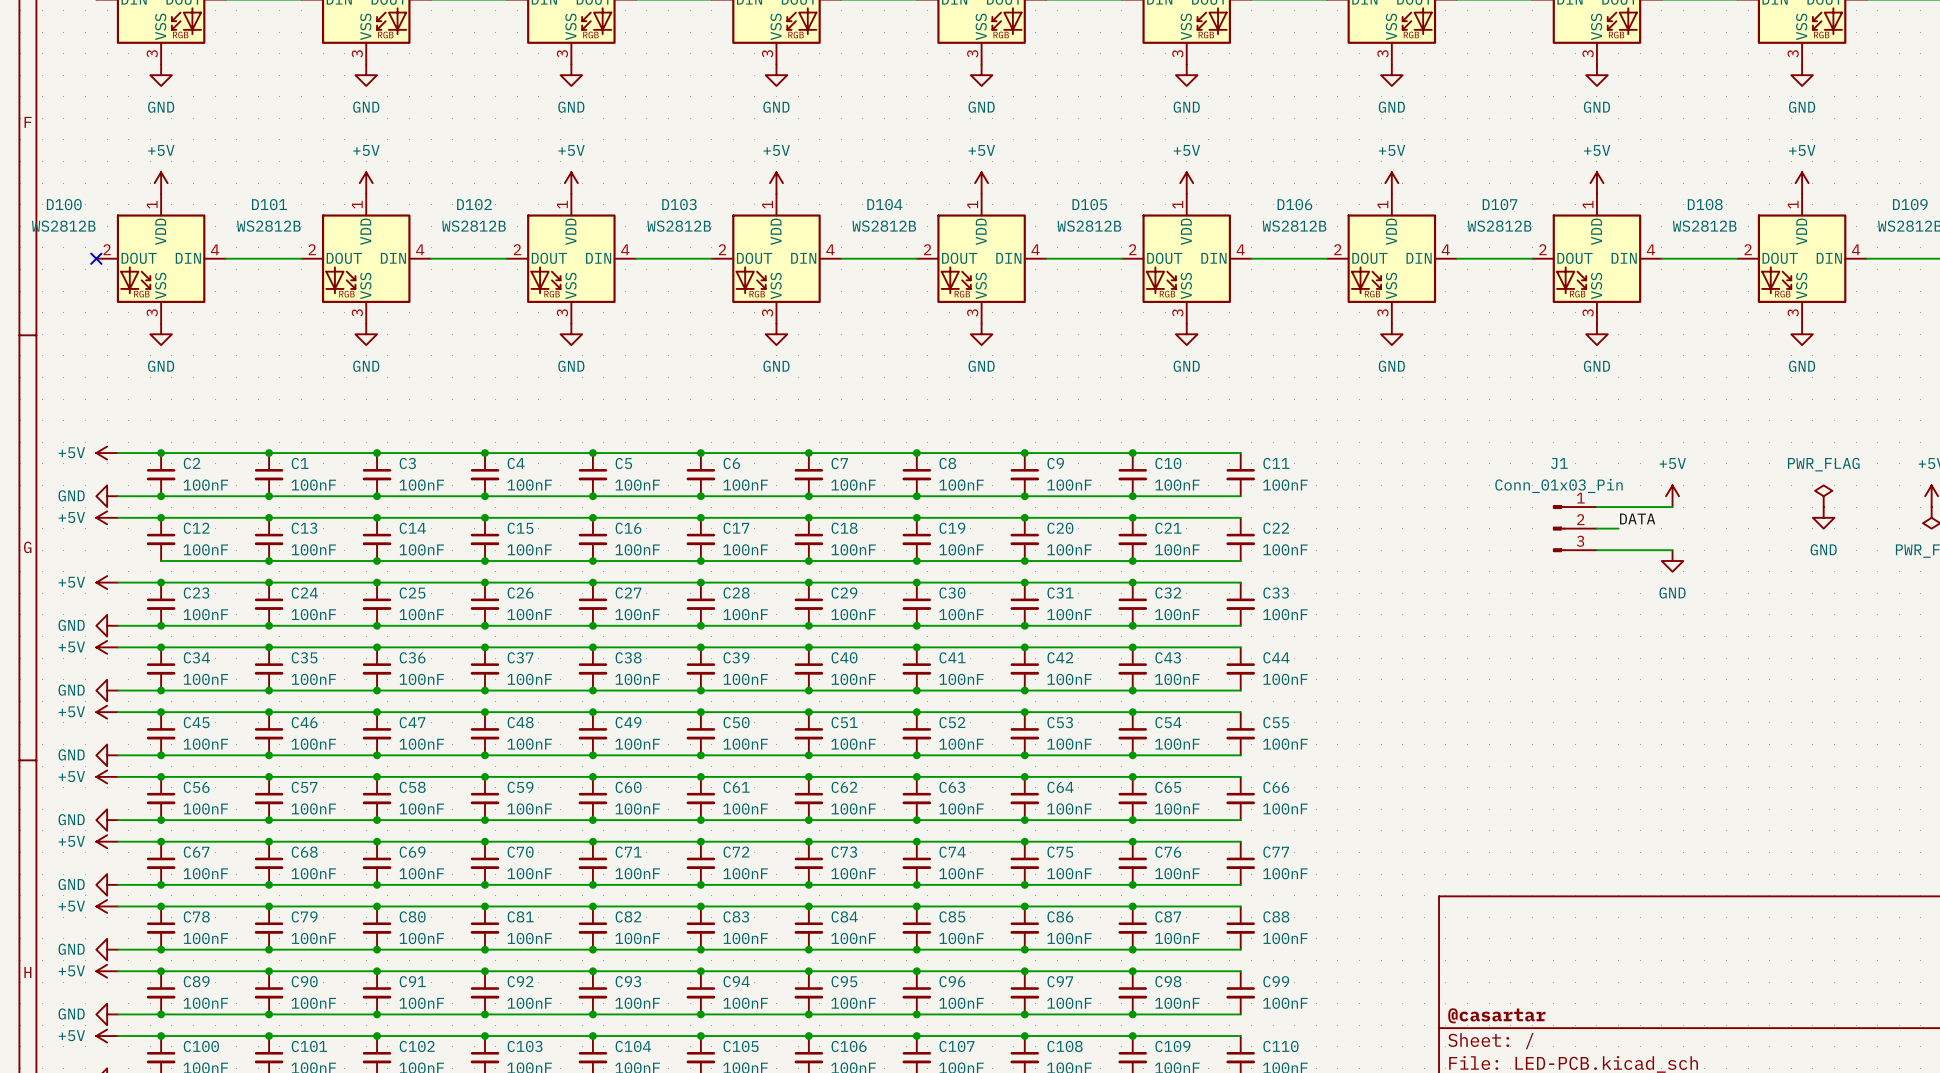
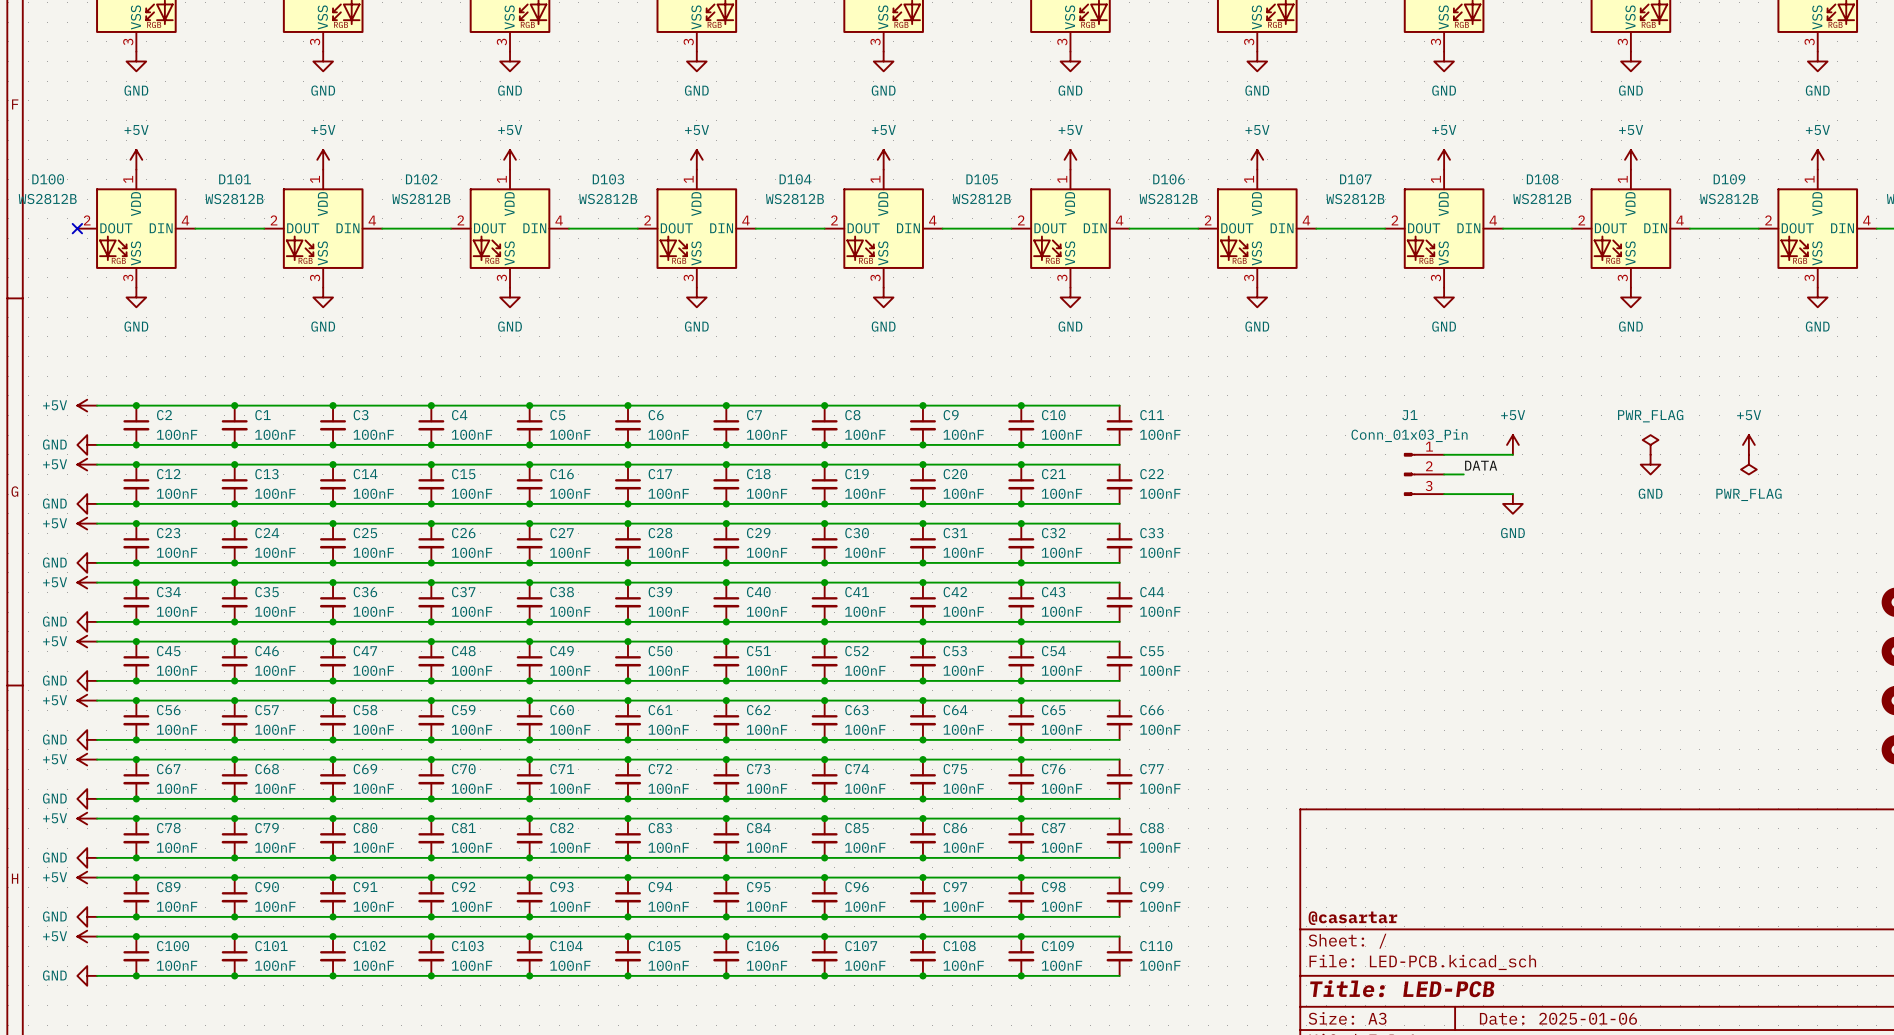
power symbol: none -> GND (87, 503)
wire: none -> (97, 503) (136, 503)
junction: none -> (136, 503)

